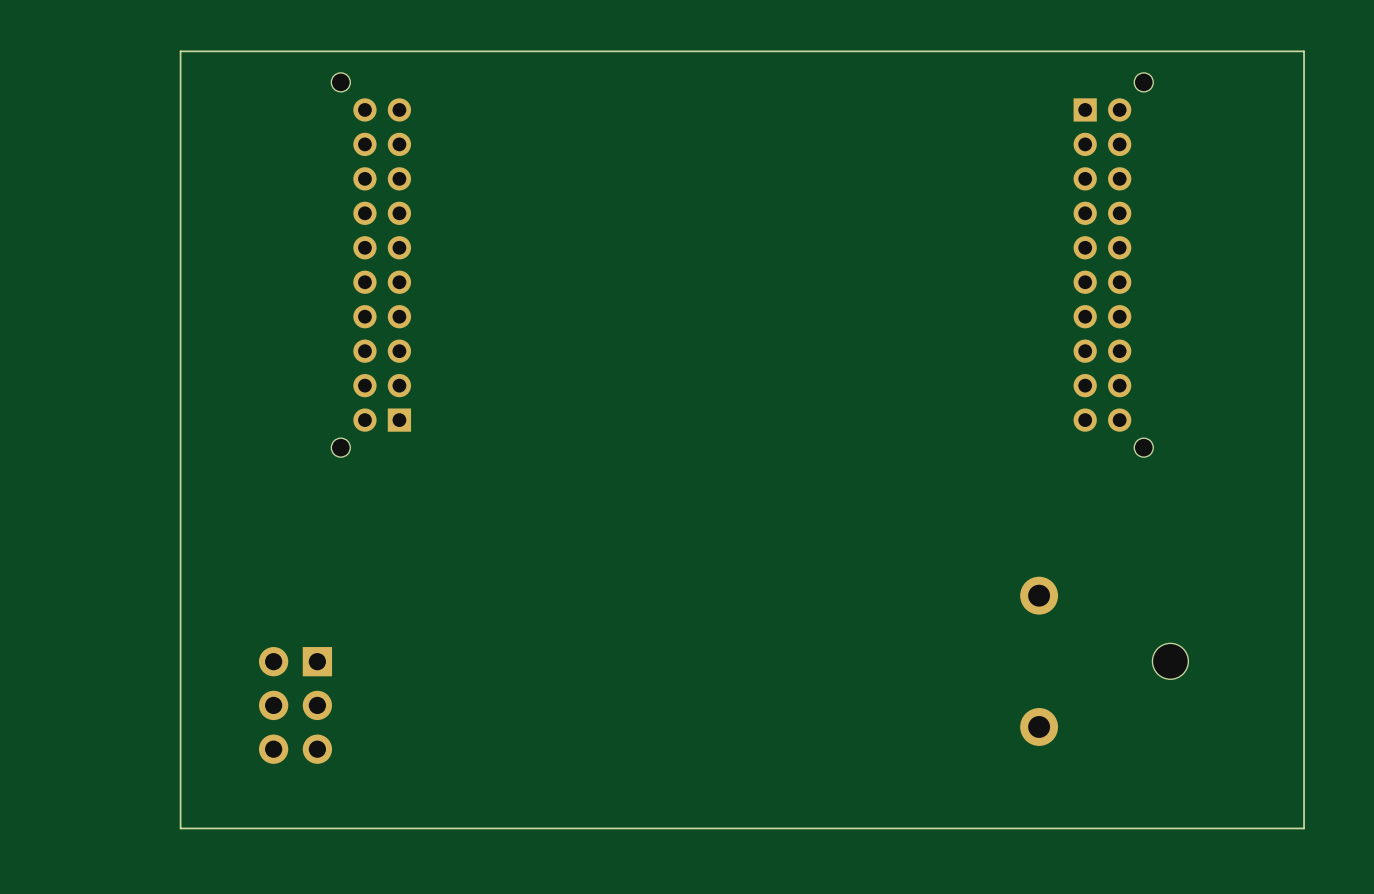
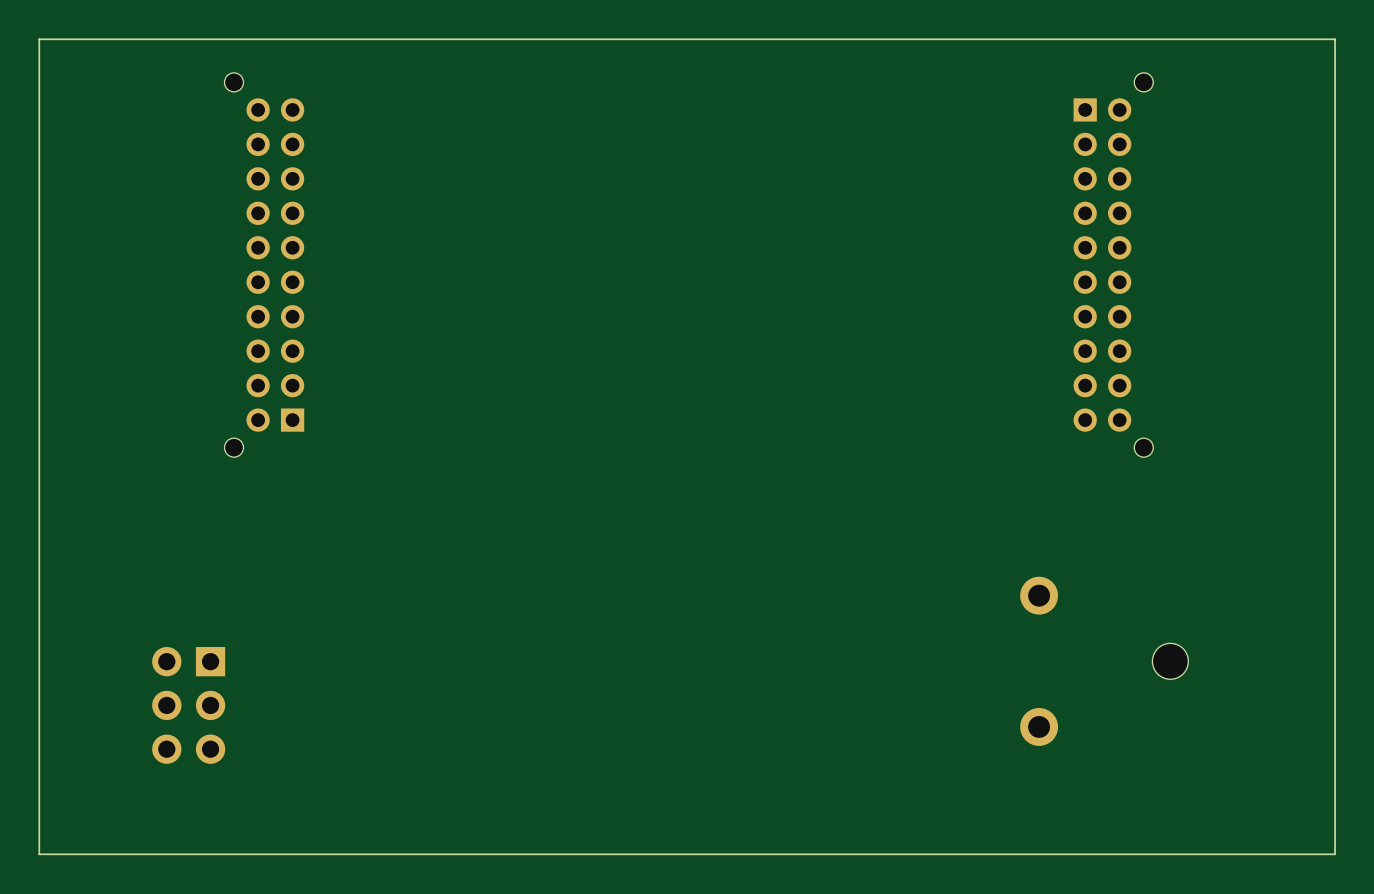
board edge: (1304, 51) (180, 51) (180, 828) (1304, 828) (1304, 51) -> (1335, 39) (1335, 854) (39, 854) (39, 39) (1335, 39)
part position: (371, 265) -> (264, 265)
part position: (295, 705) -> (188, 705)

